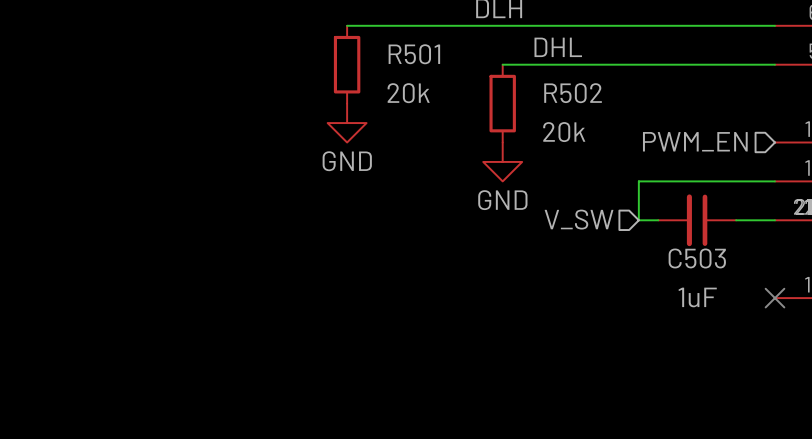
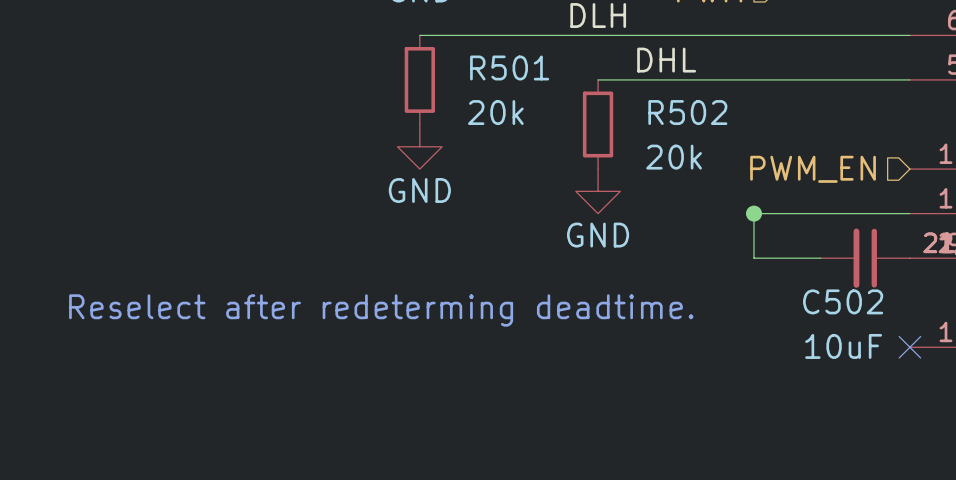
junction: none -> (753, 213)
hierarchical label: V_SW (579, 219) -> none
C503: 1uF (697, 220) -> none
C502: none -> 10uF (865, 258)
text: none -> Reselect after redeterming deadtime. (381, 310)

